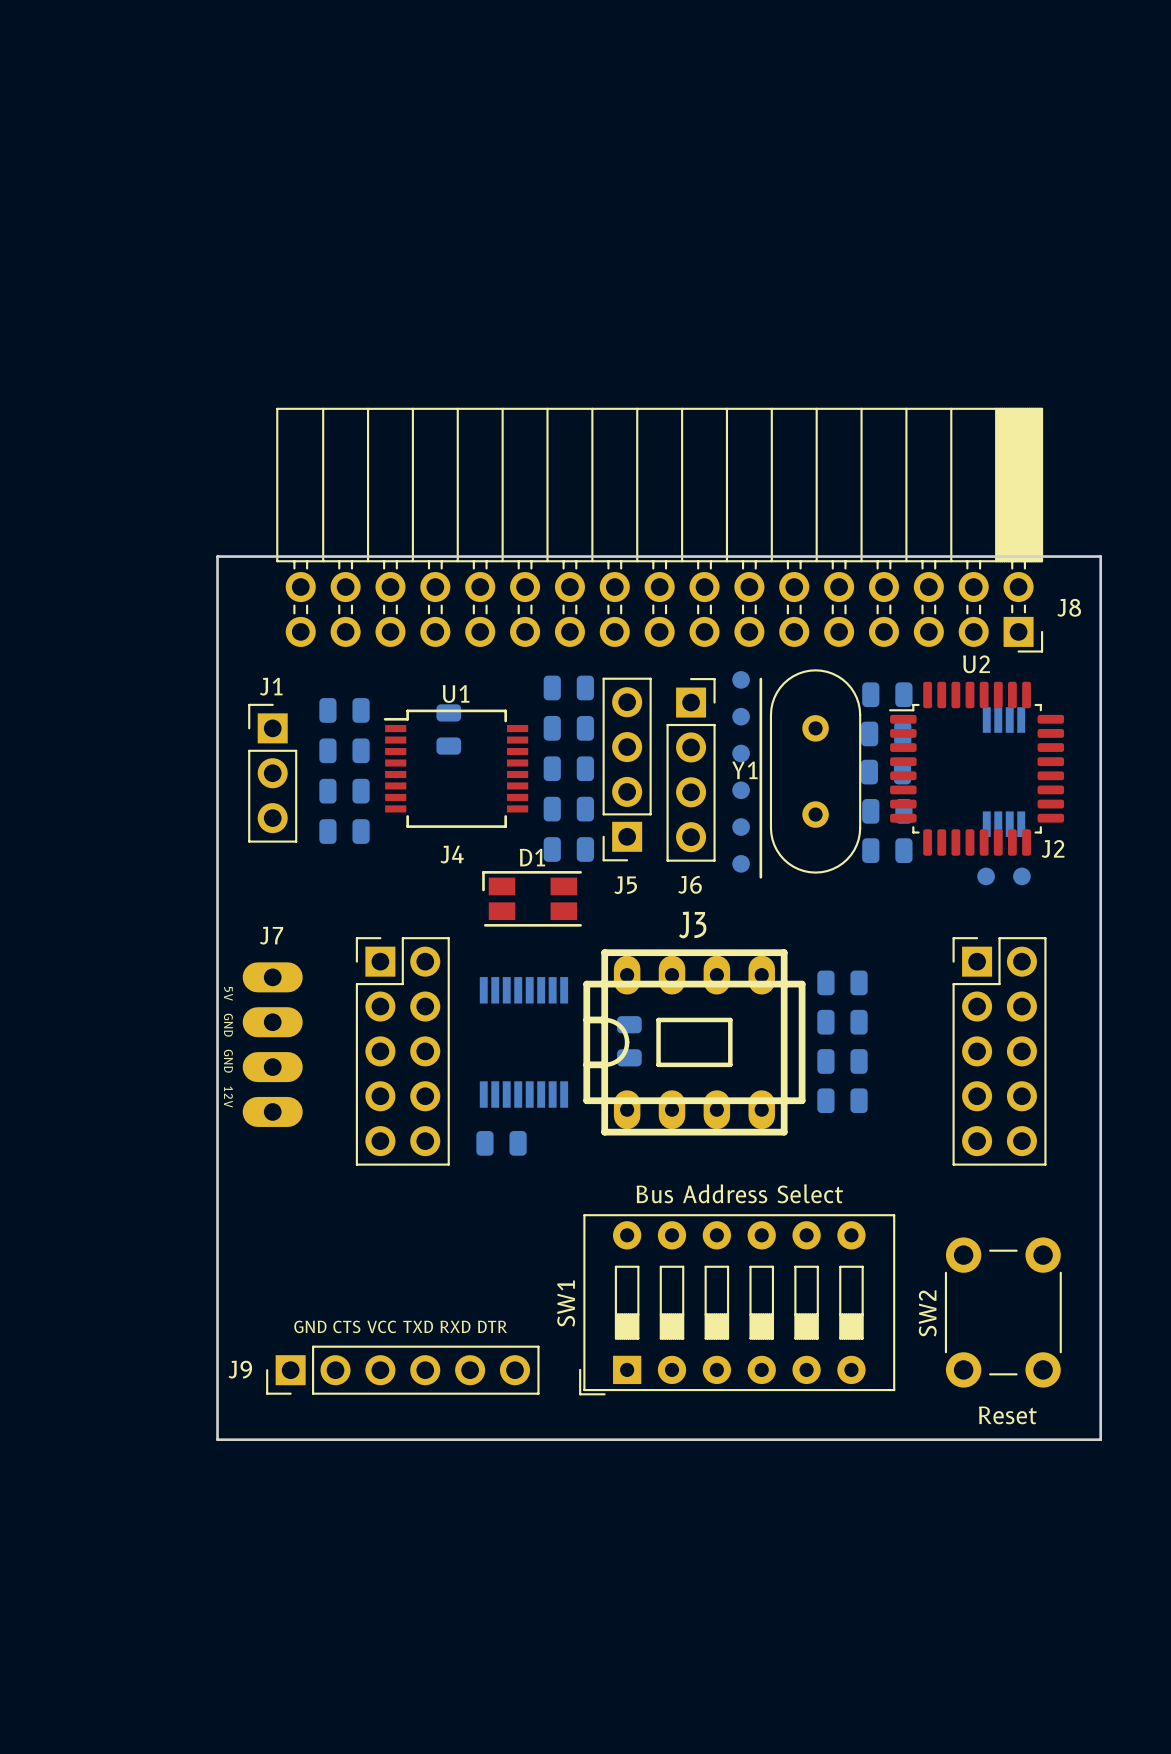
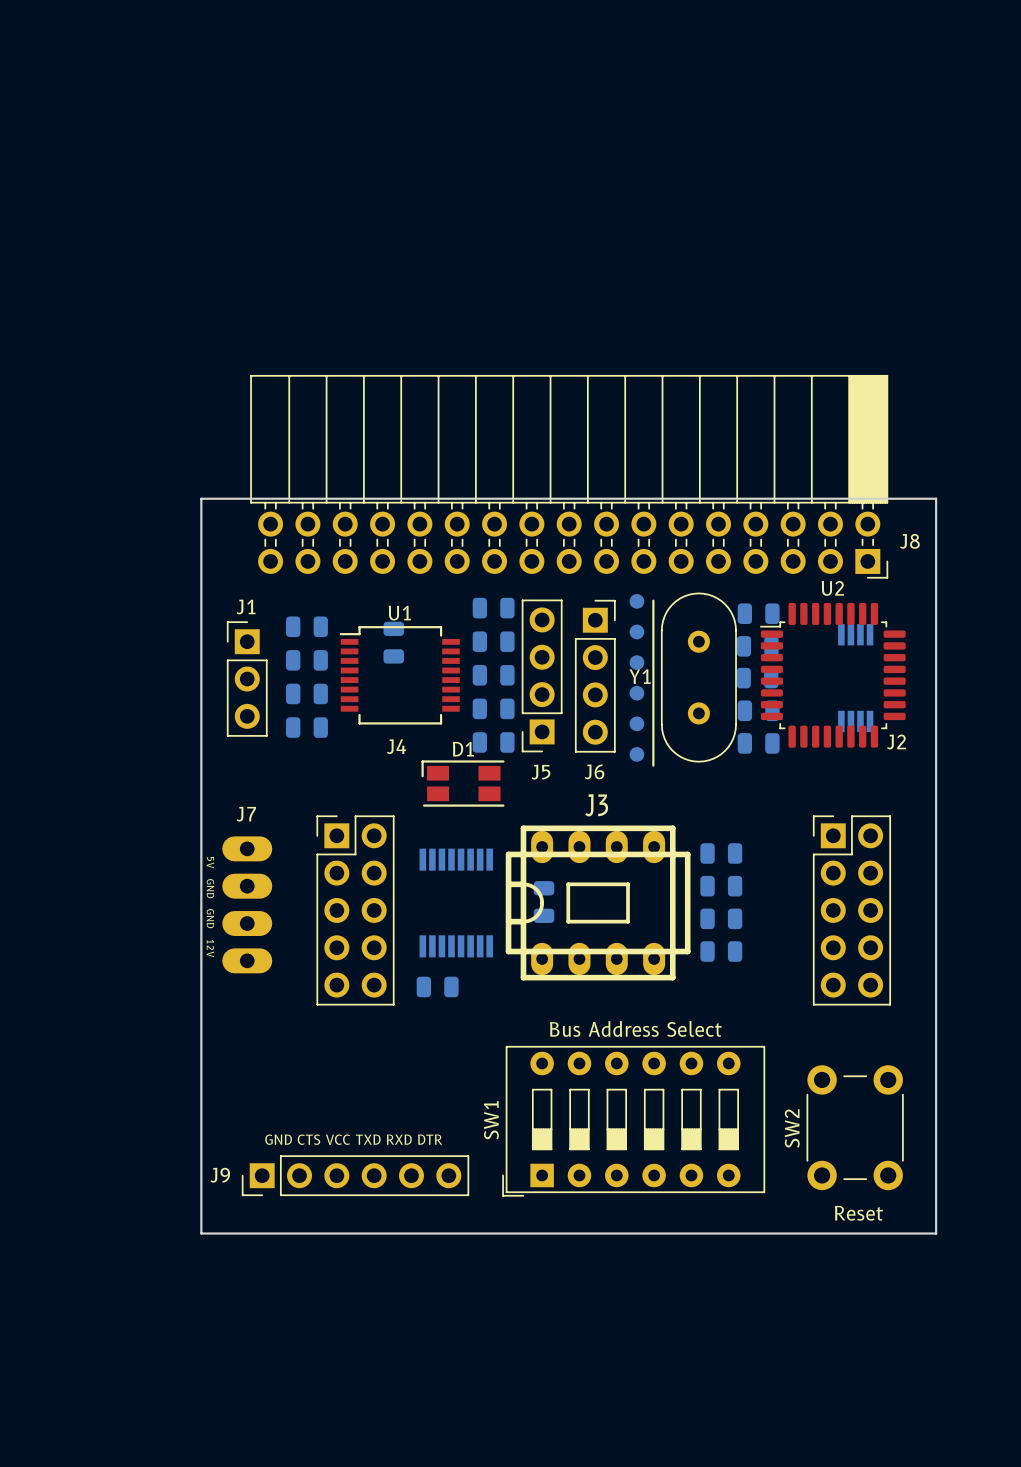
part: (986, 876) -> none
part: (1021, 876) -> none

